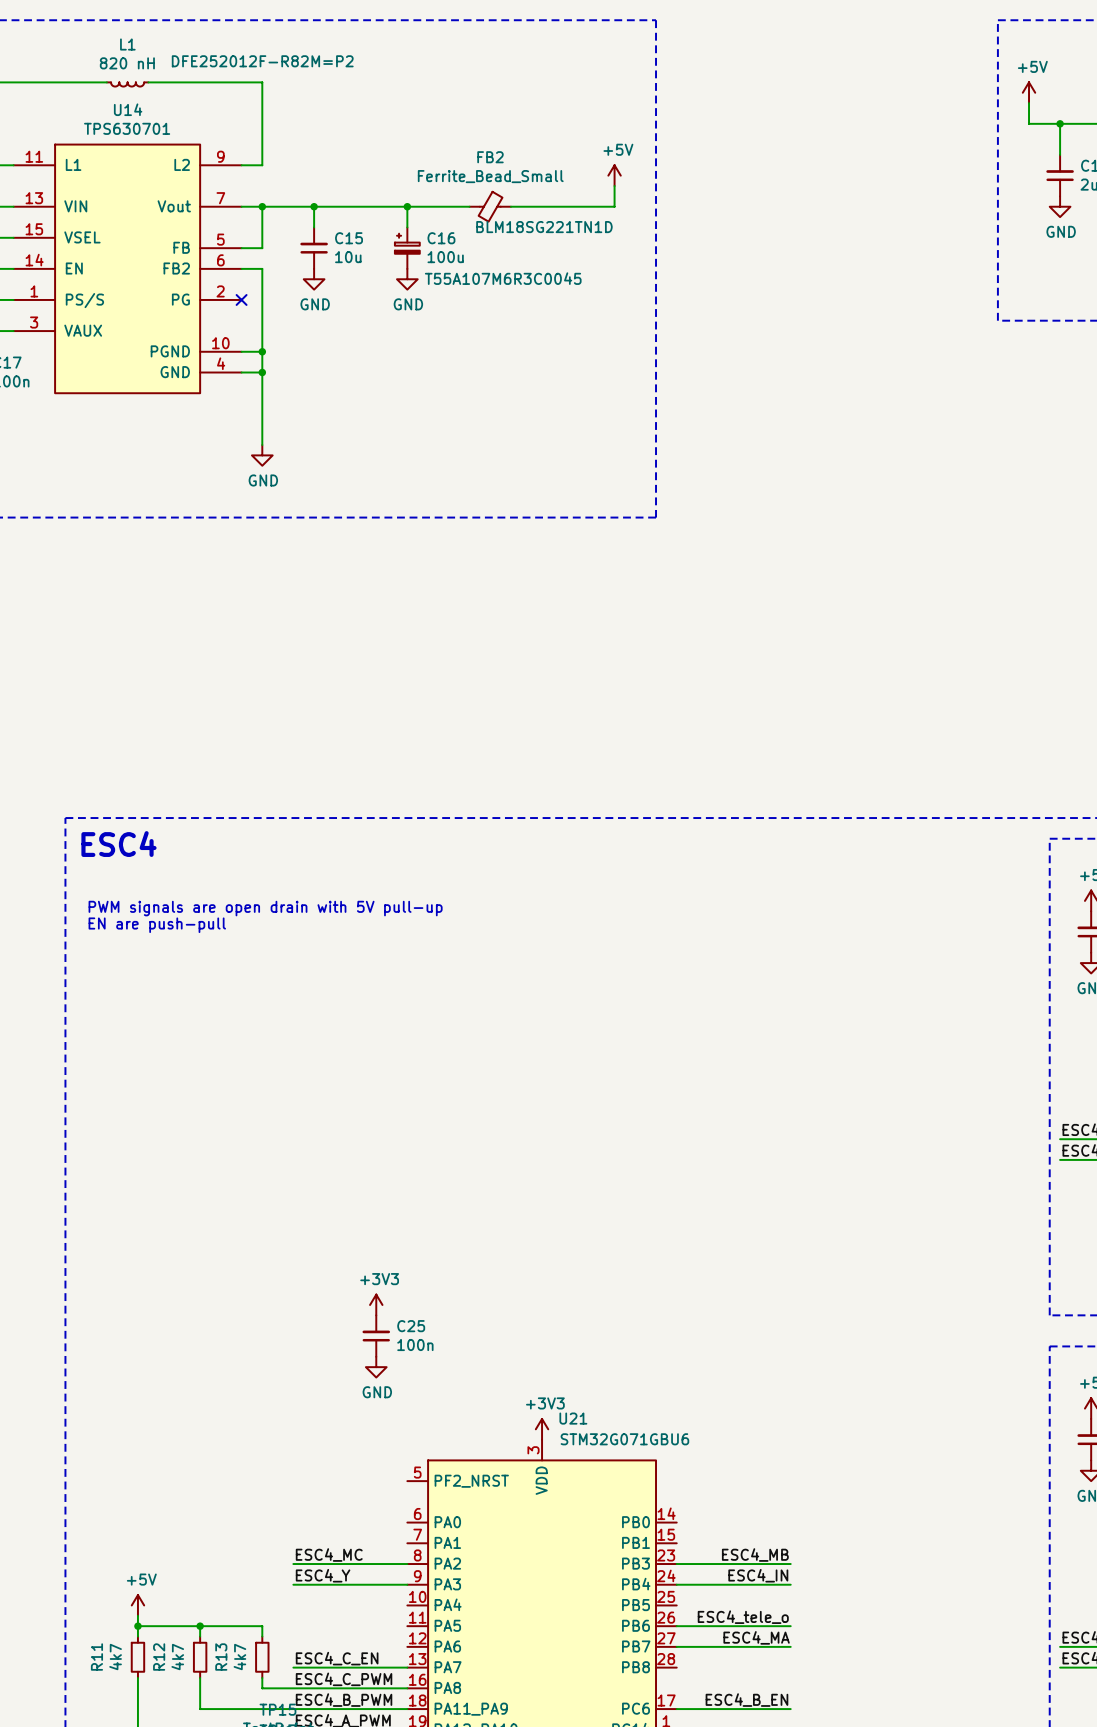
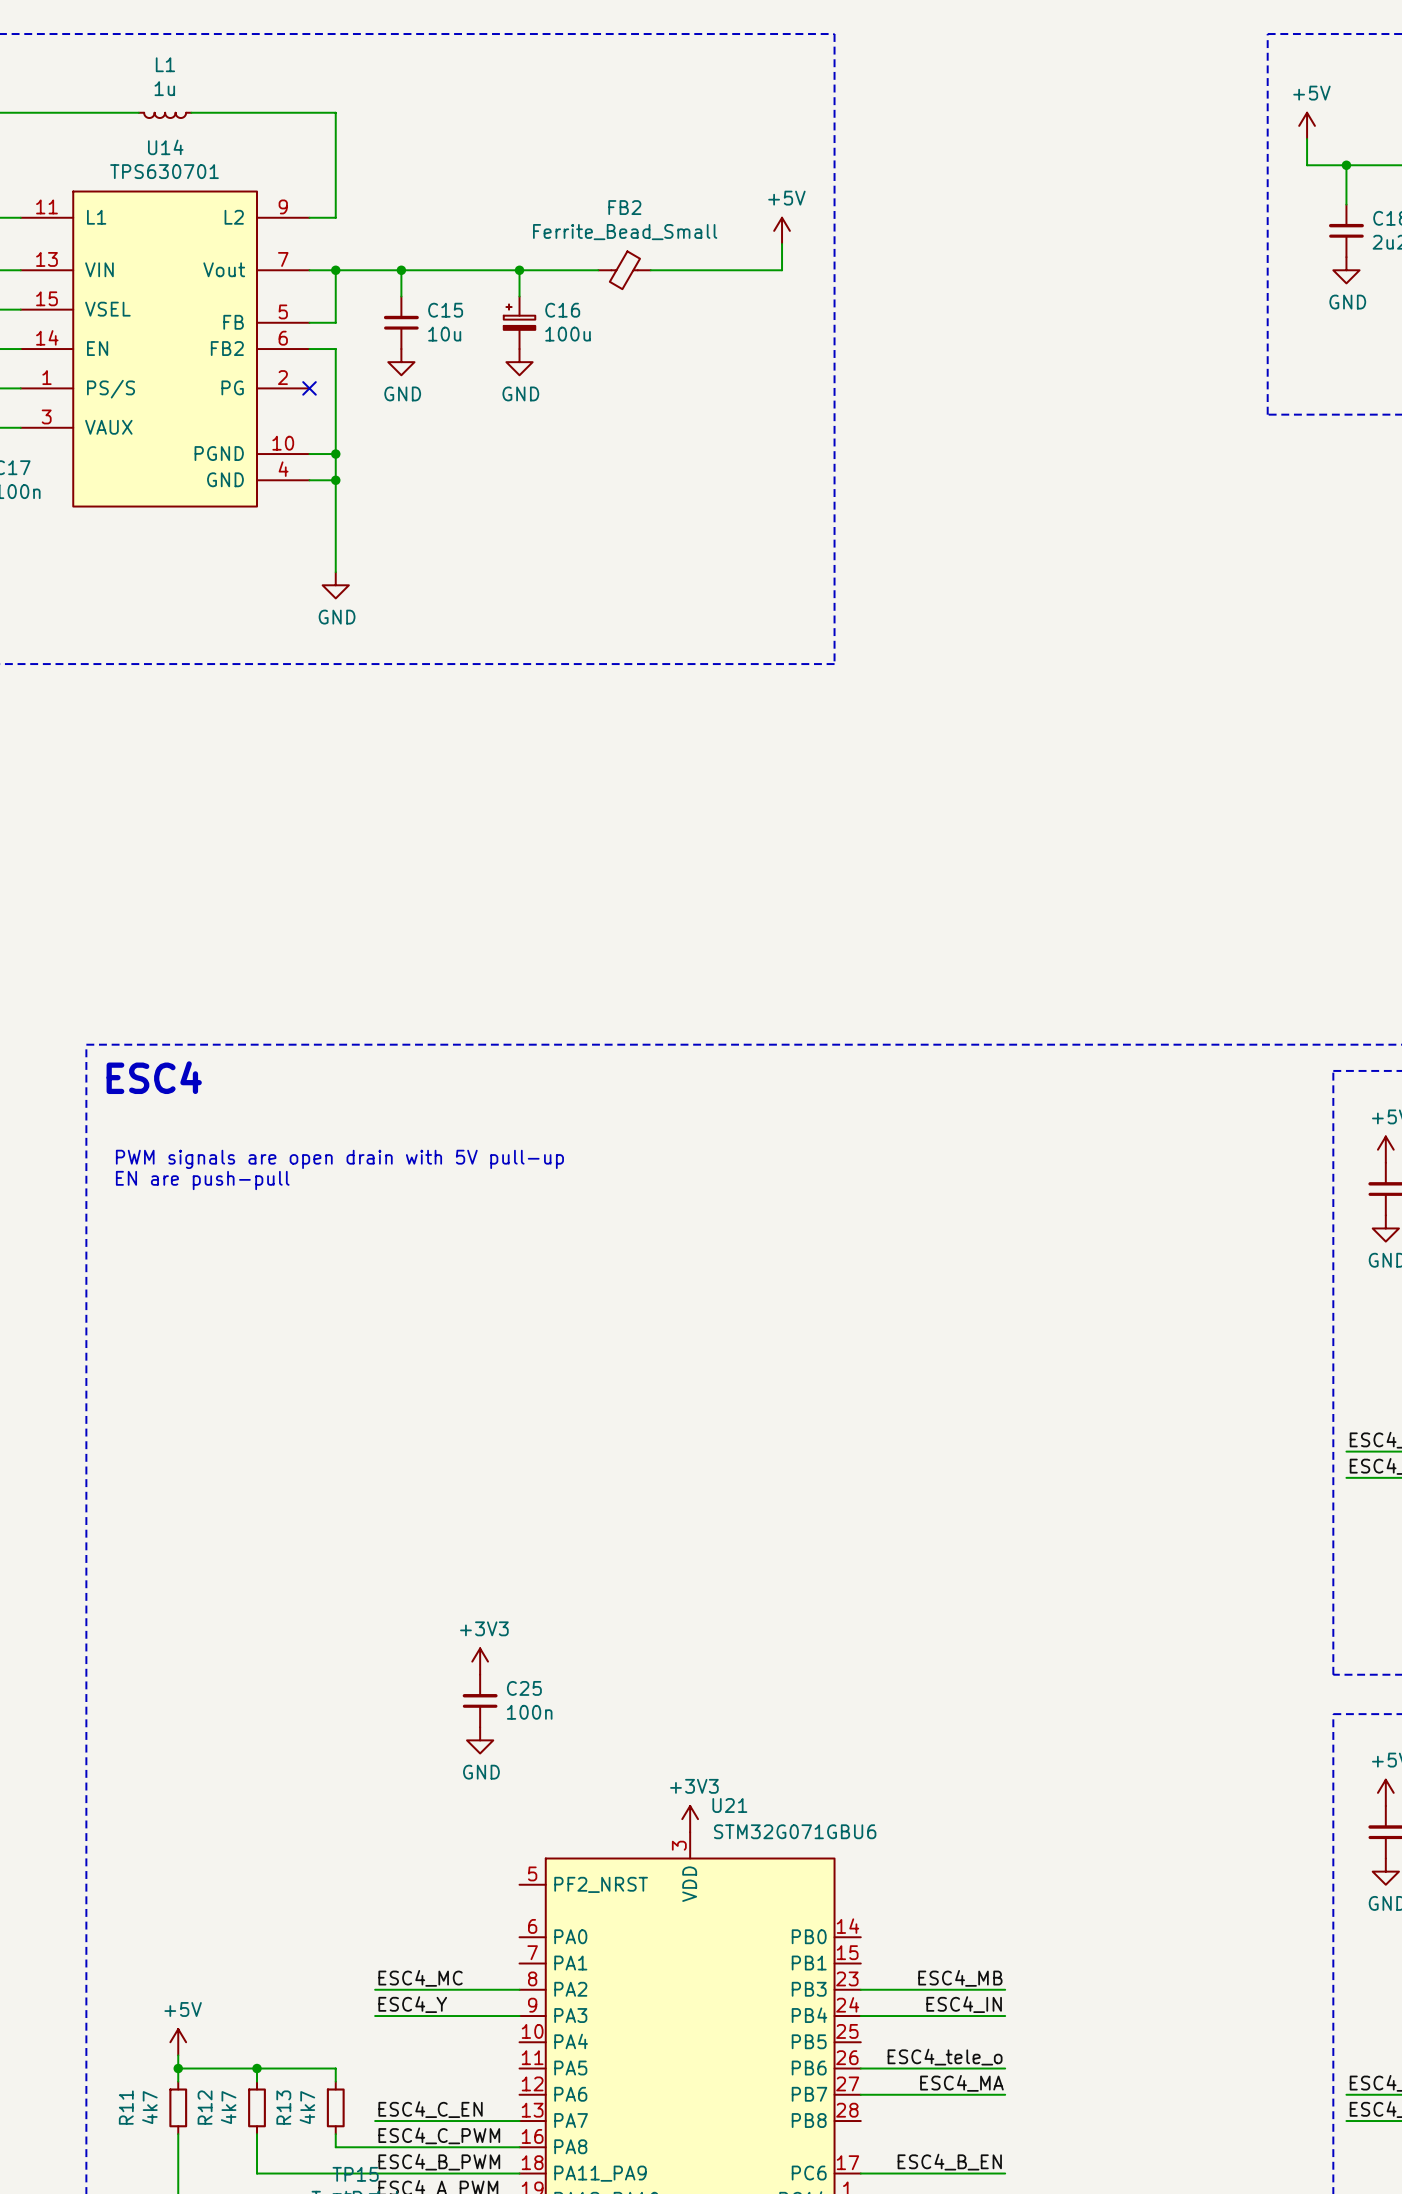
L1 text: DFE252012F-R82M=P2 (262, 61) -> none
L1 value: 820 nH (127, 63) -> 1u (164, 88)
FB2 text: BLM18SG221TN1D (544, 227) -> none
C16 text: T55A107M6R3C0045 (503, 278) -> none

